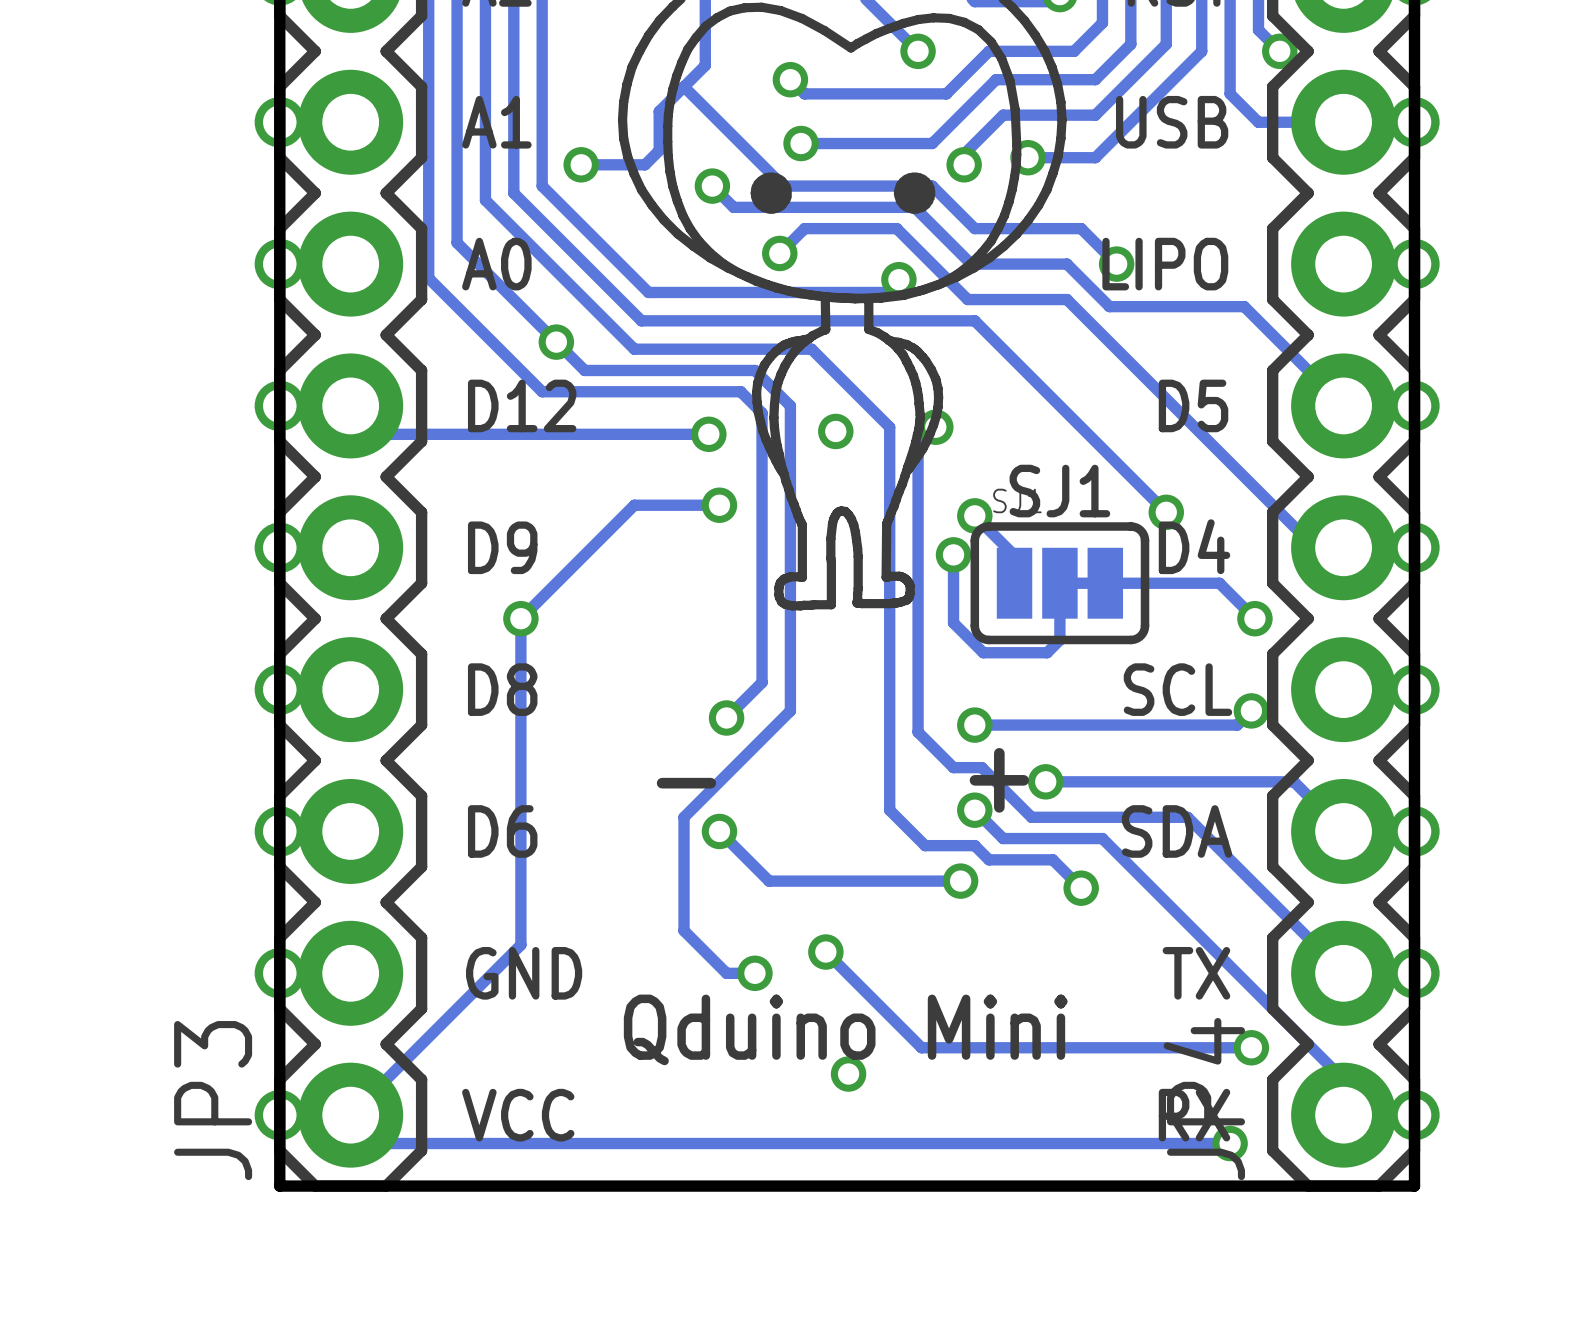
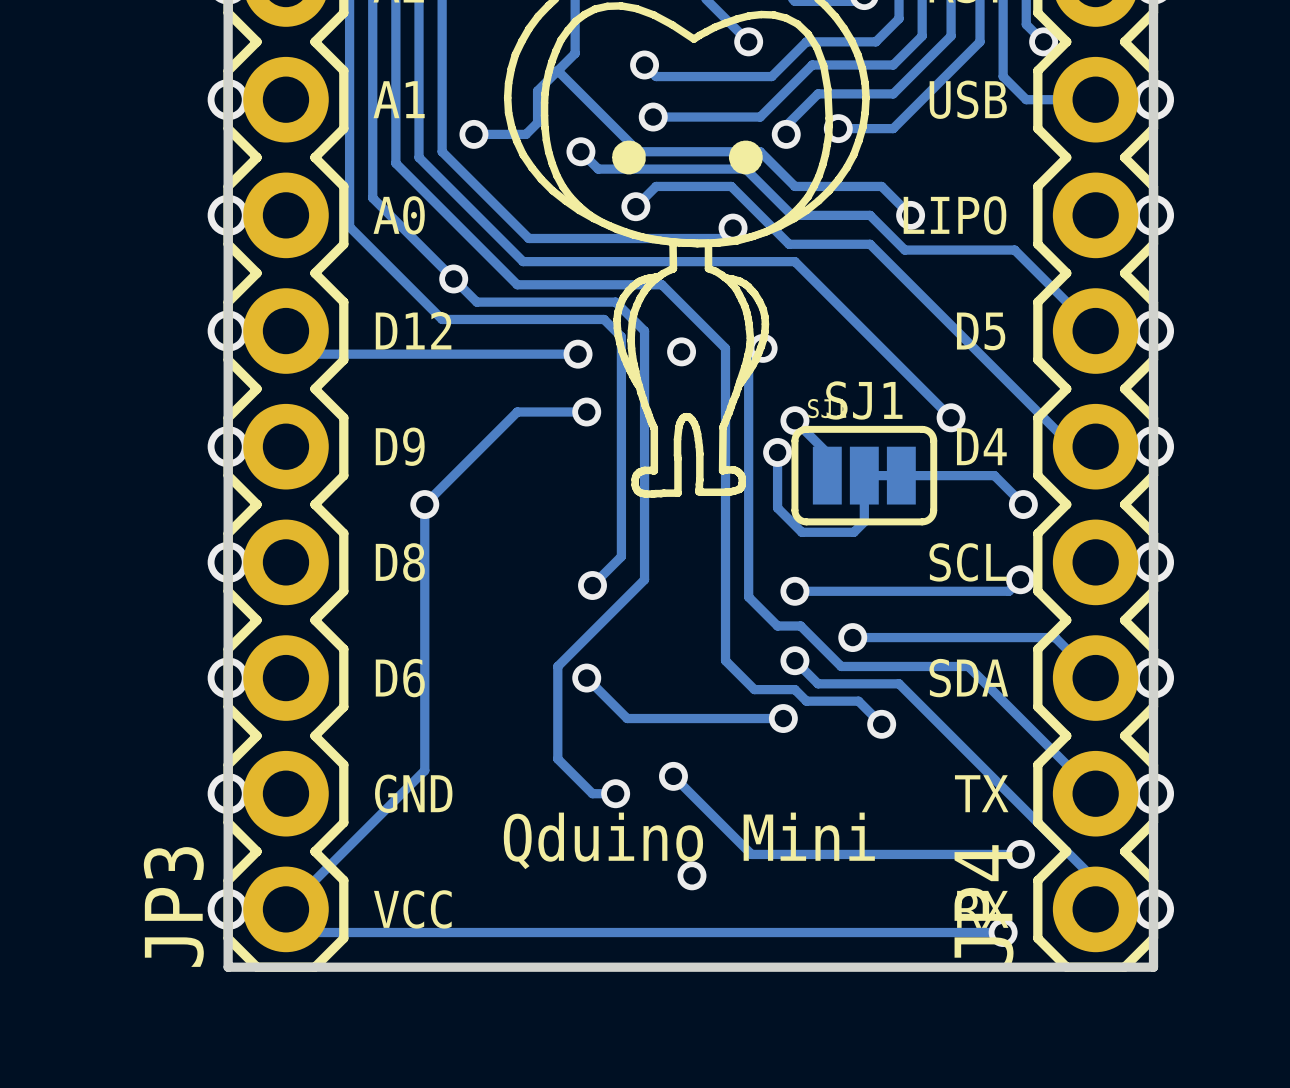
part: (842, 780) -> none

